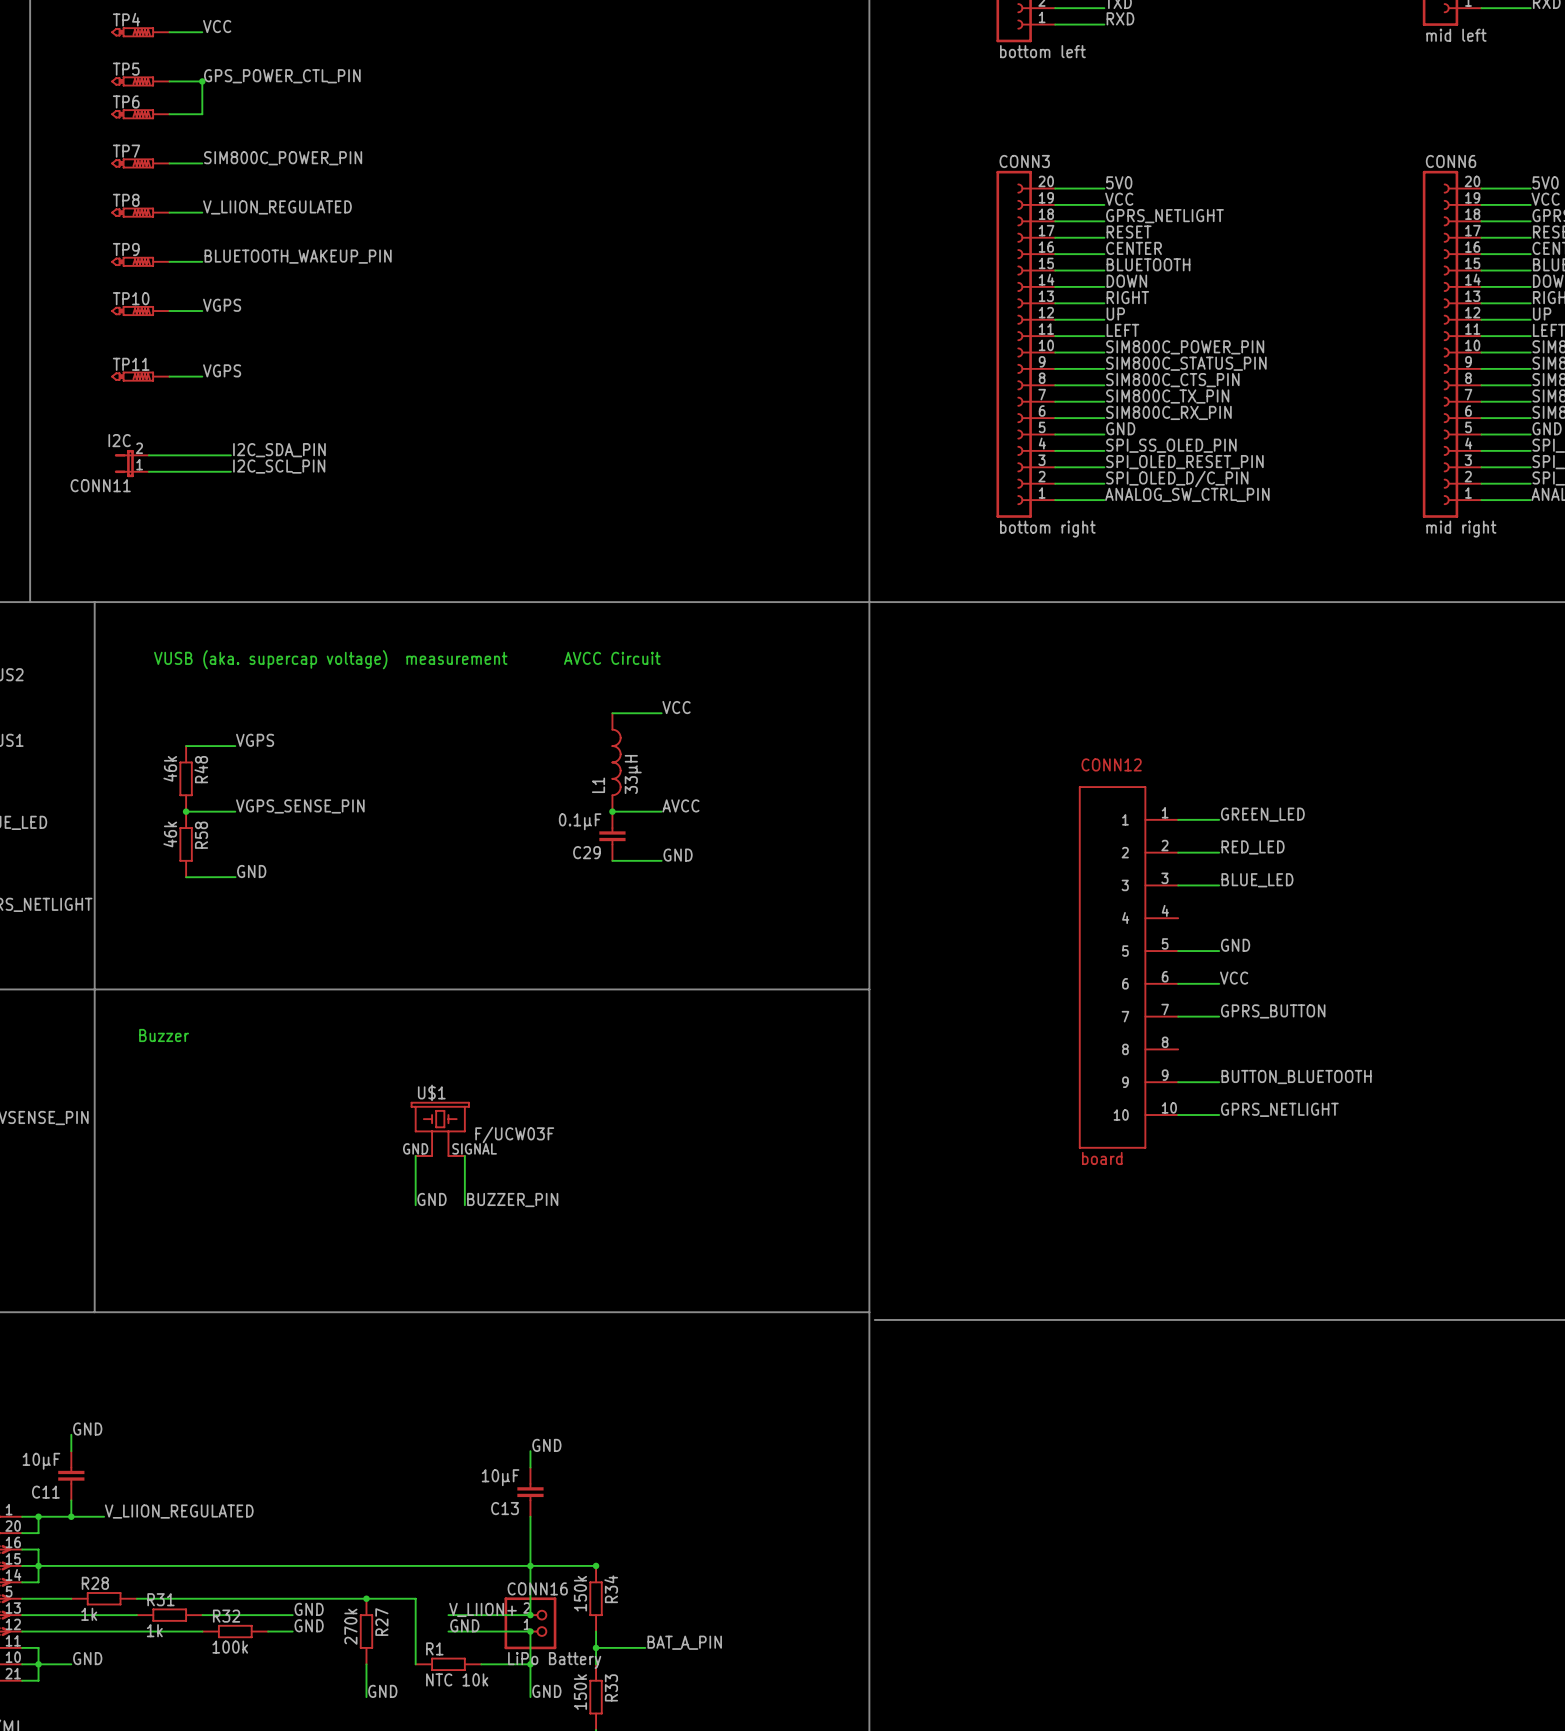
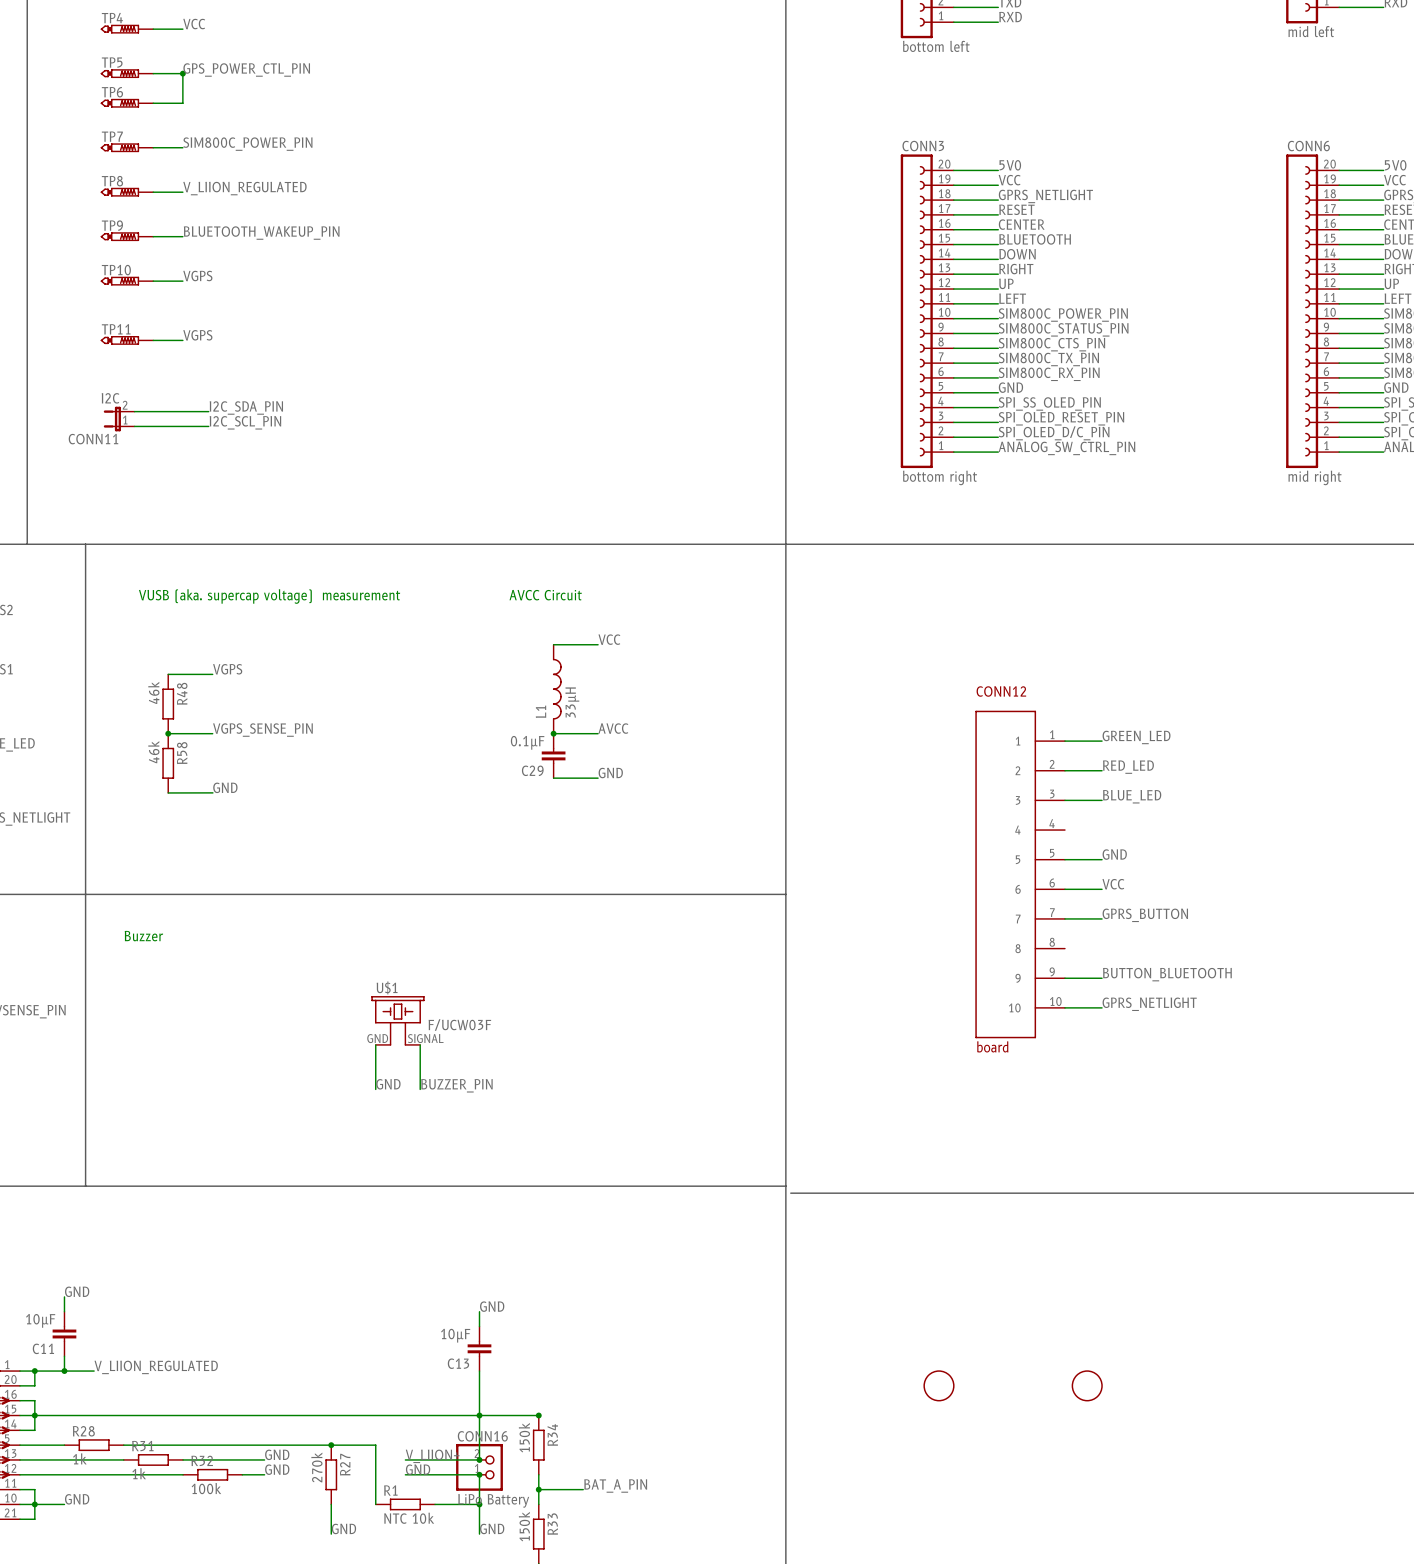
part: none -> (938, 1385)
part: none -> (1087, 1385)

